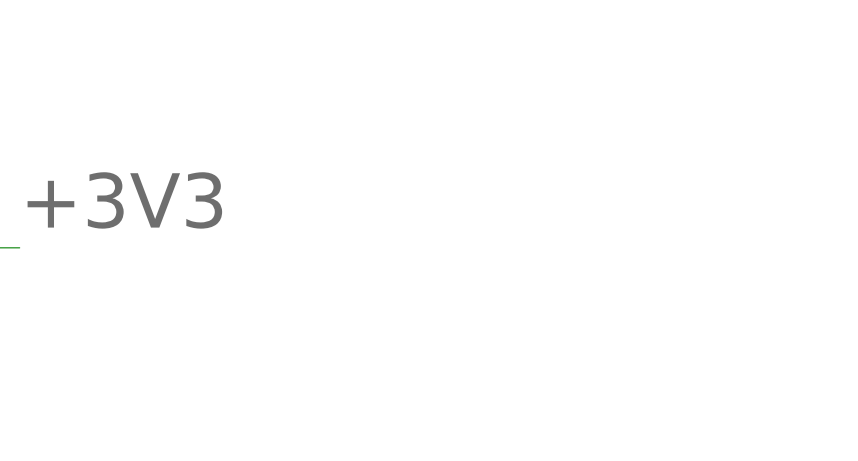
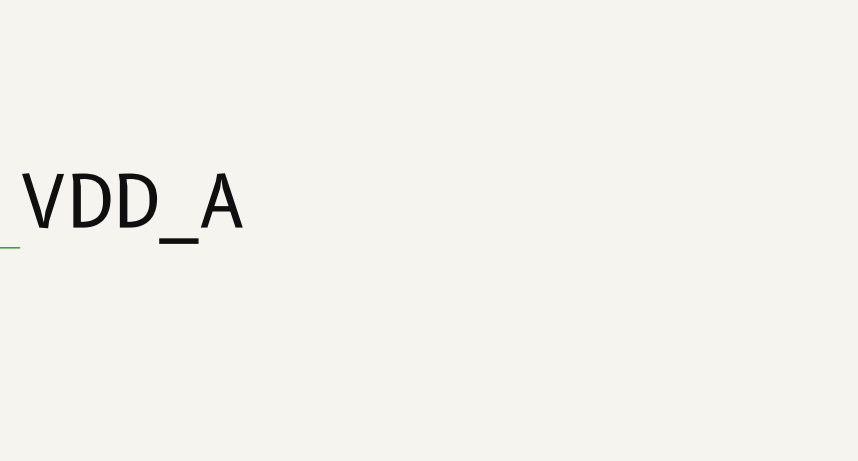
label: +3V3 (124, 200) -> VDD_A (132, 208)

